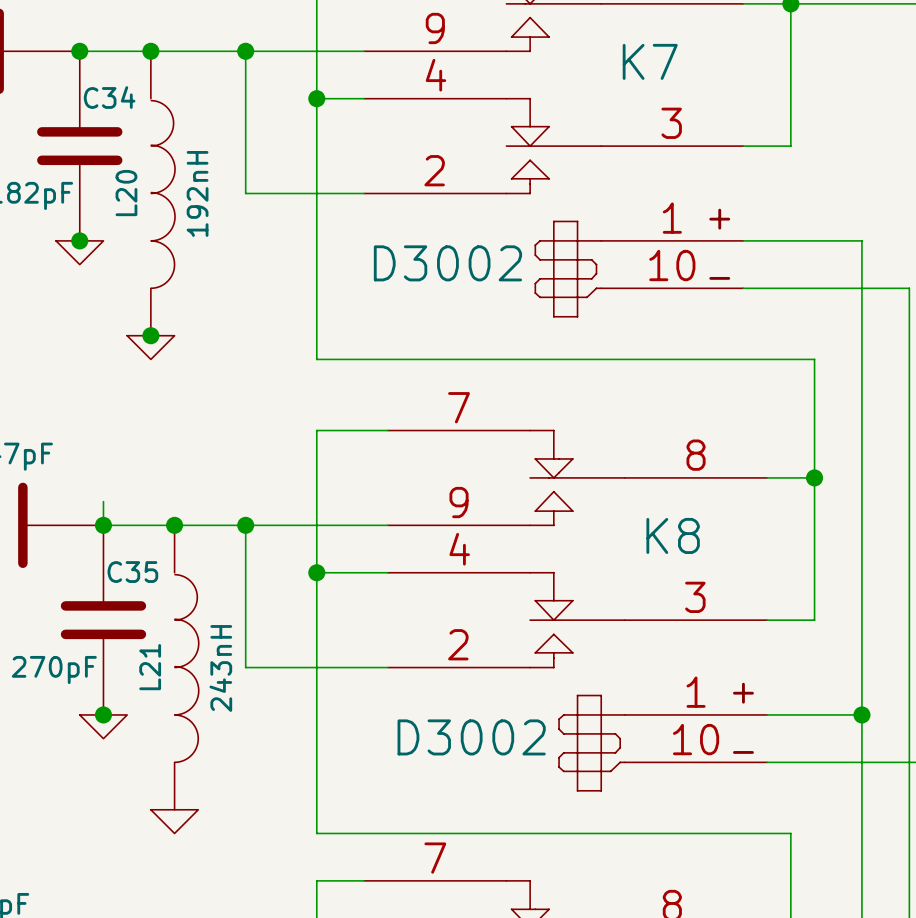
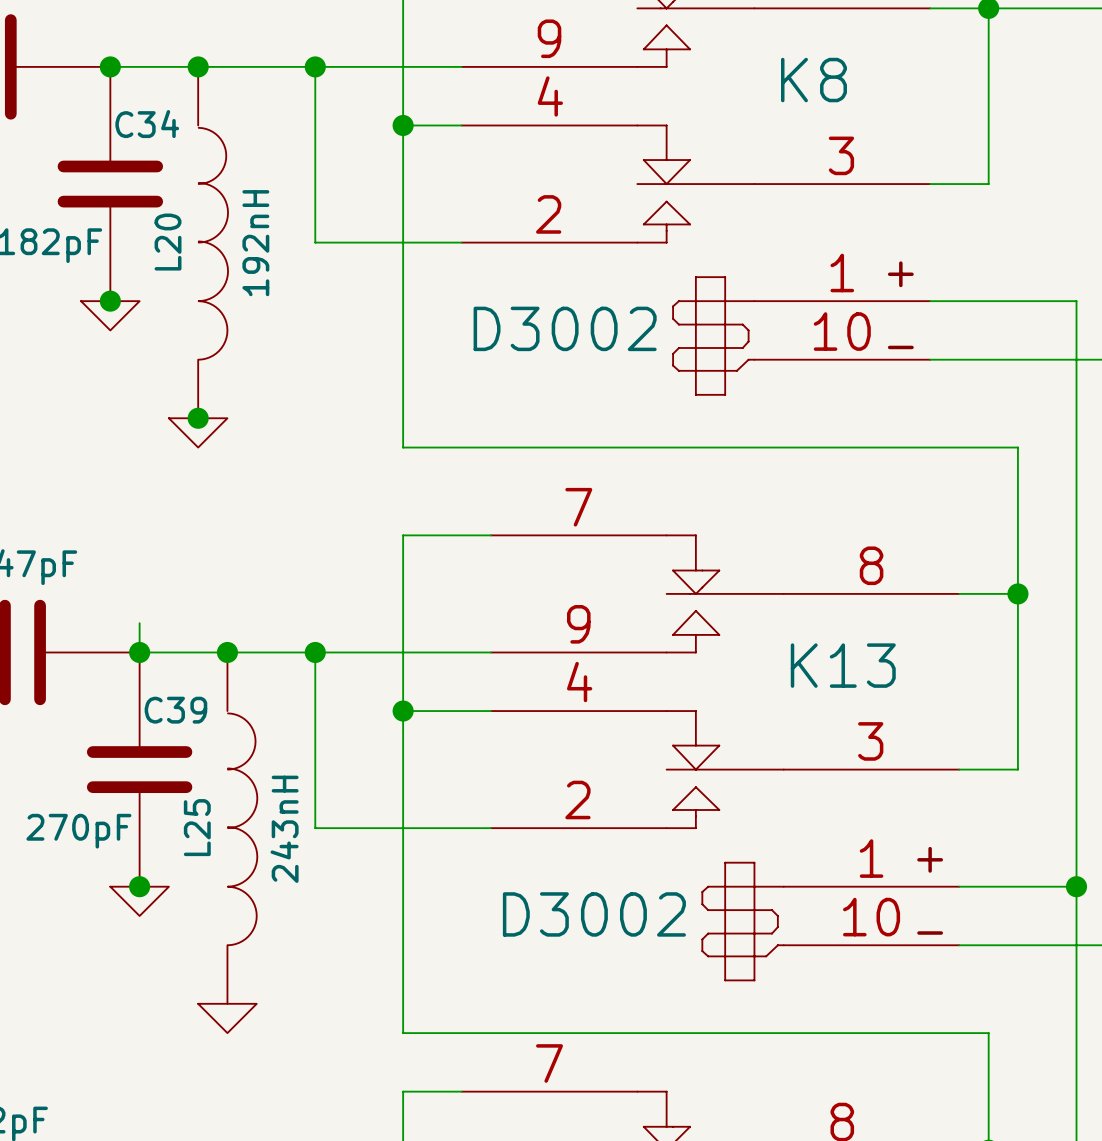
K7 name: K7 (650, 61) -> K8 (813, 80)
K8 name: K8 (673, 535) -> K13 (843, 665)
C35 name: C35 (132, 572) -> C39 (175, 710)
L21 name: L21 (150, 667) -> L25 (197, 827)

